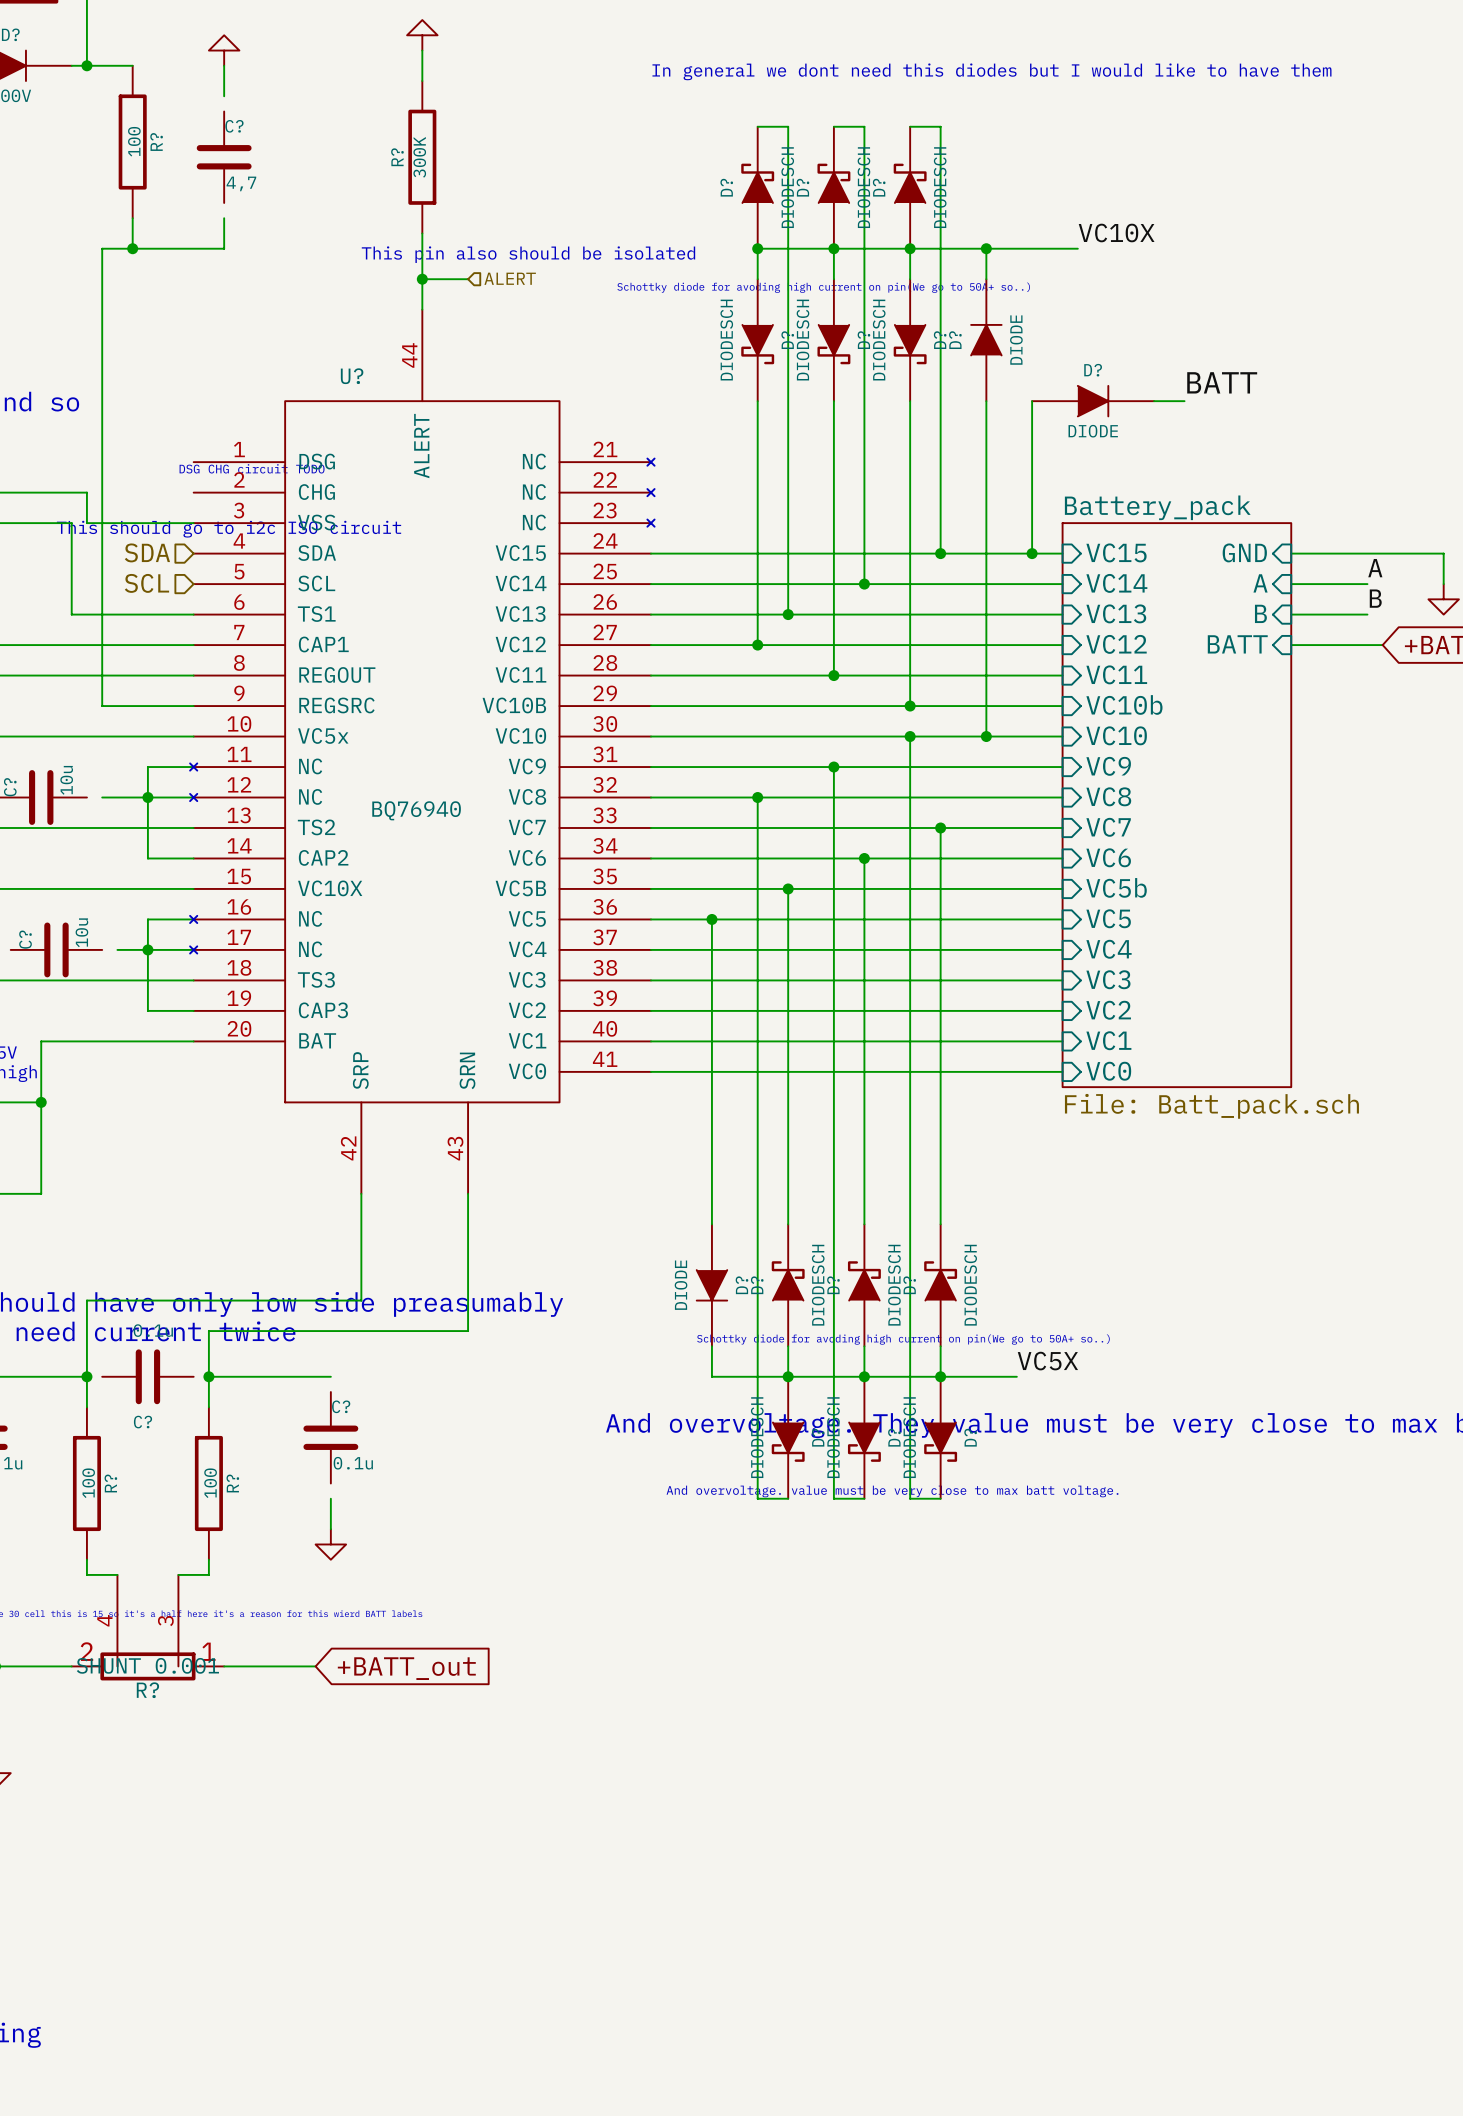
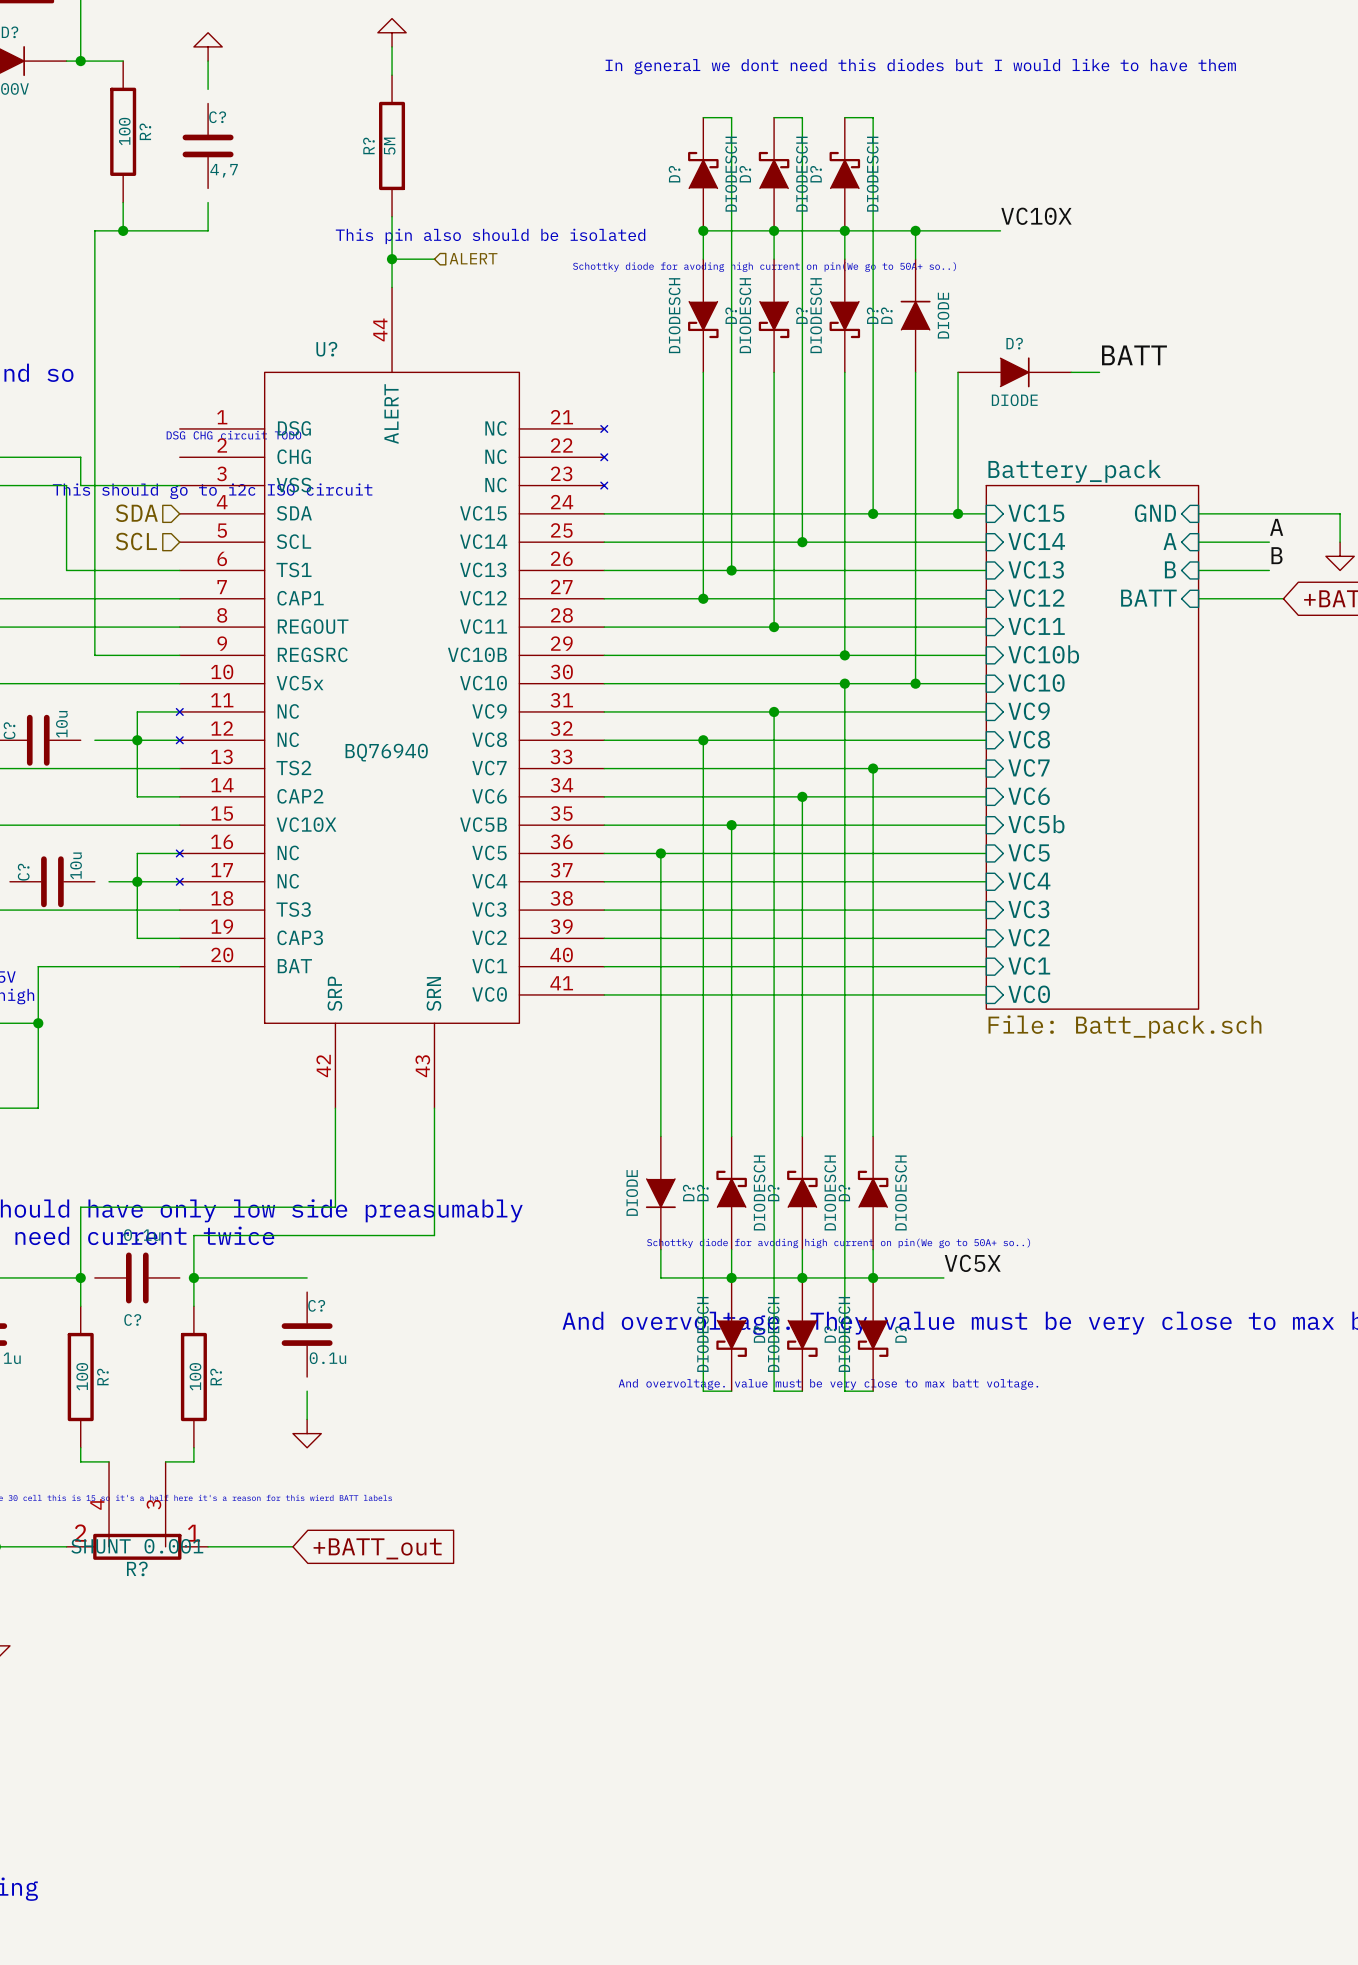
R? value: 300K (419, 157) -> 5M (389, 146)

